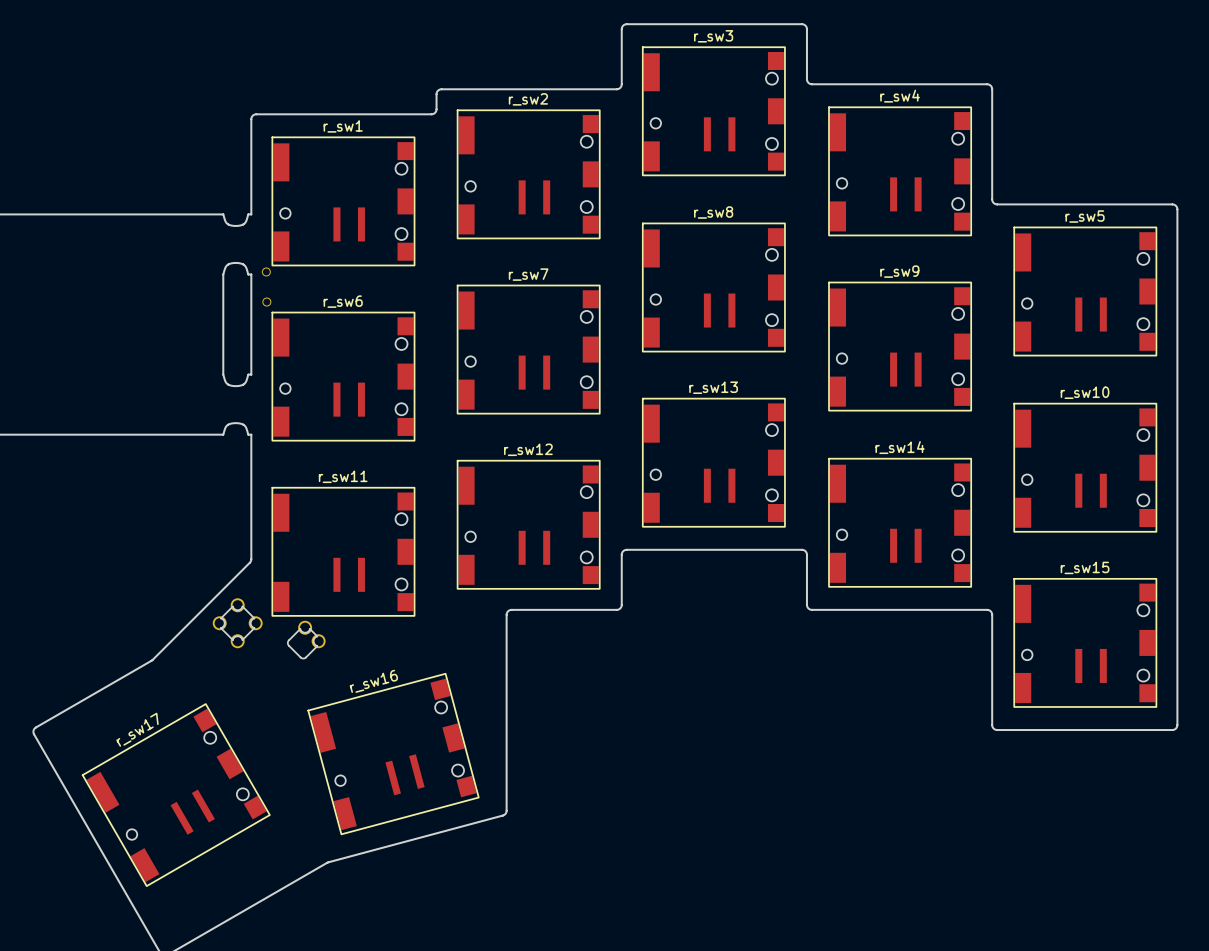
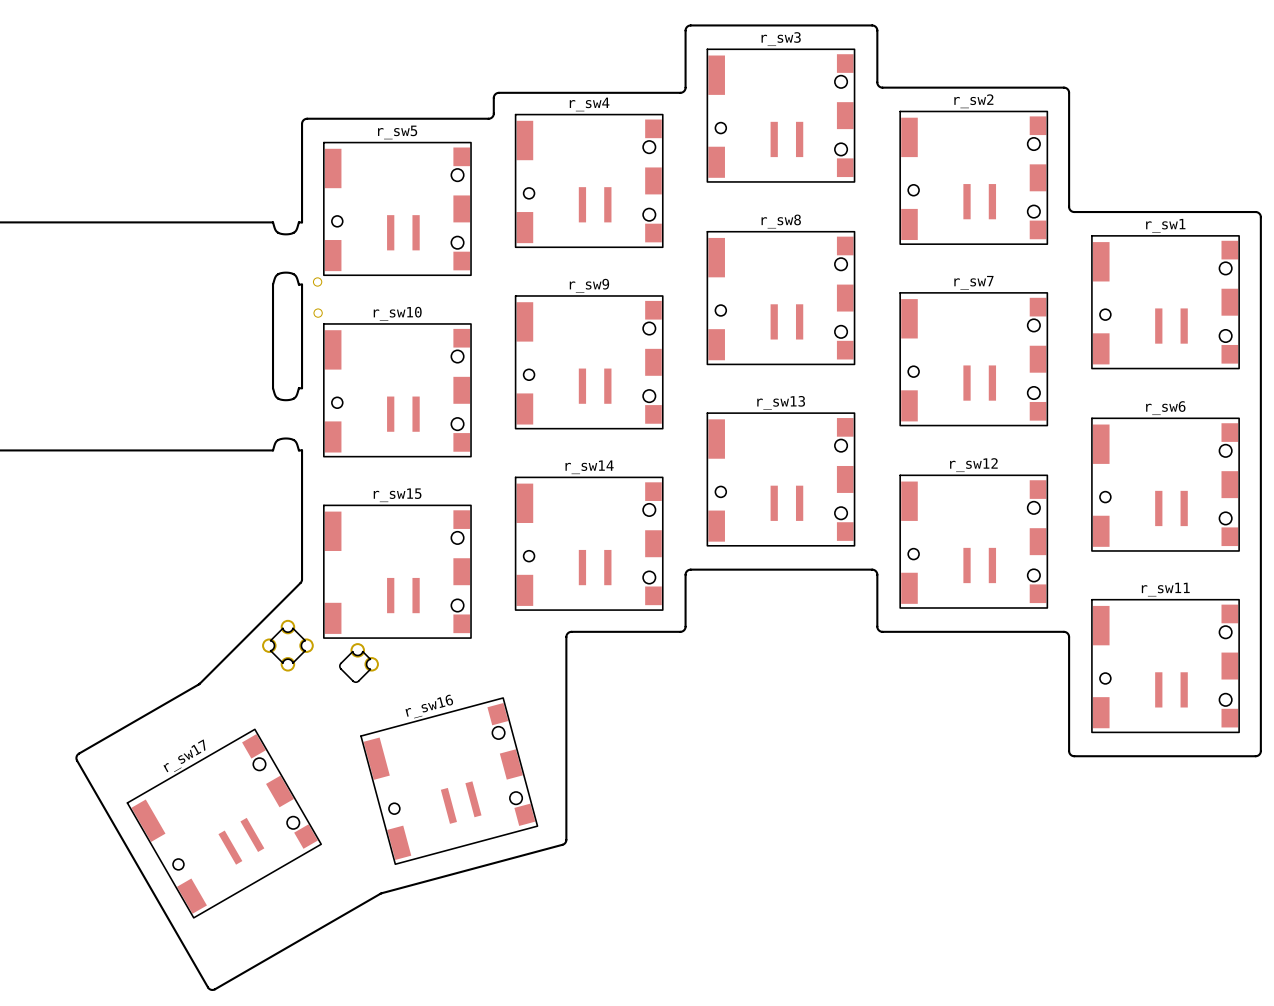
r_sw4 name: r_sw4 (900, 96) -> r_sw2 (973, 101)
r_sw2 name: r_sw2 (528, 99) -> r_sw4 (589, 104)
r_sw1 name: r_sw1 (343, 126) -> r_sw5 (397, 132)
r_sw5 name: r_sw5 (1085, 216) -> r_sw1 (1165, 225)
r_sw9 name: r_sw9 (899, 271) -> r_sw7 (973, 282)
r_sw7 name: r_sw7 (528, 274) -> r_sw9 (589, 285)
r_sw6 name: r_sw6 (343, 301) -> r_sw10 (397, 313)
r_sw10 name: r_sw10 (1085, 392) -> r_sw6 (1165, 408)
r_sw14 name: r_sw14 (900, 447) -> r_sw12 (973, 465)
r_sw12 name: r_sw12 (528, 449) -> r_sw14 (589, 467)
r_sw11 name: r_sw11 (343, 476) -> r_sw15 (397, 495)
r_sw15 name: r_sw15 (1085, 567) -> r_sw11 (1165, 589)

